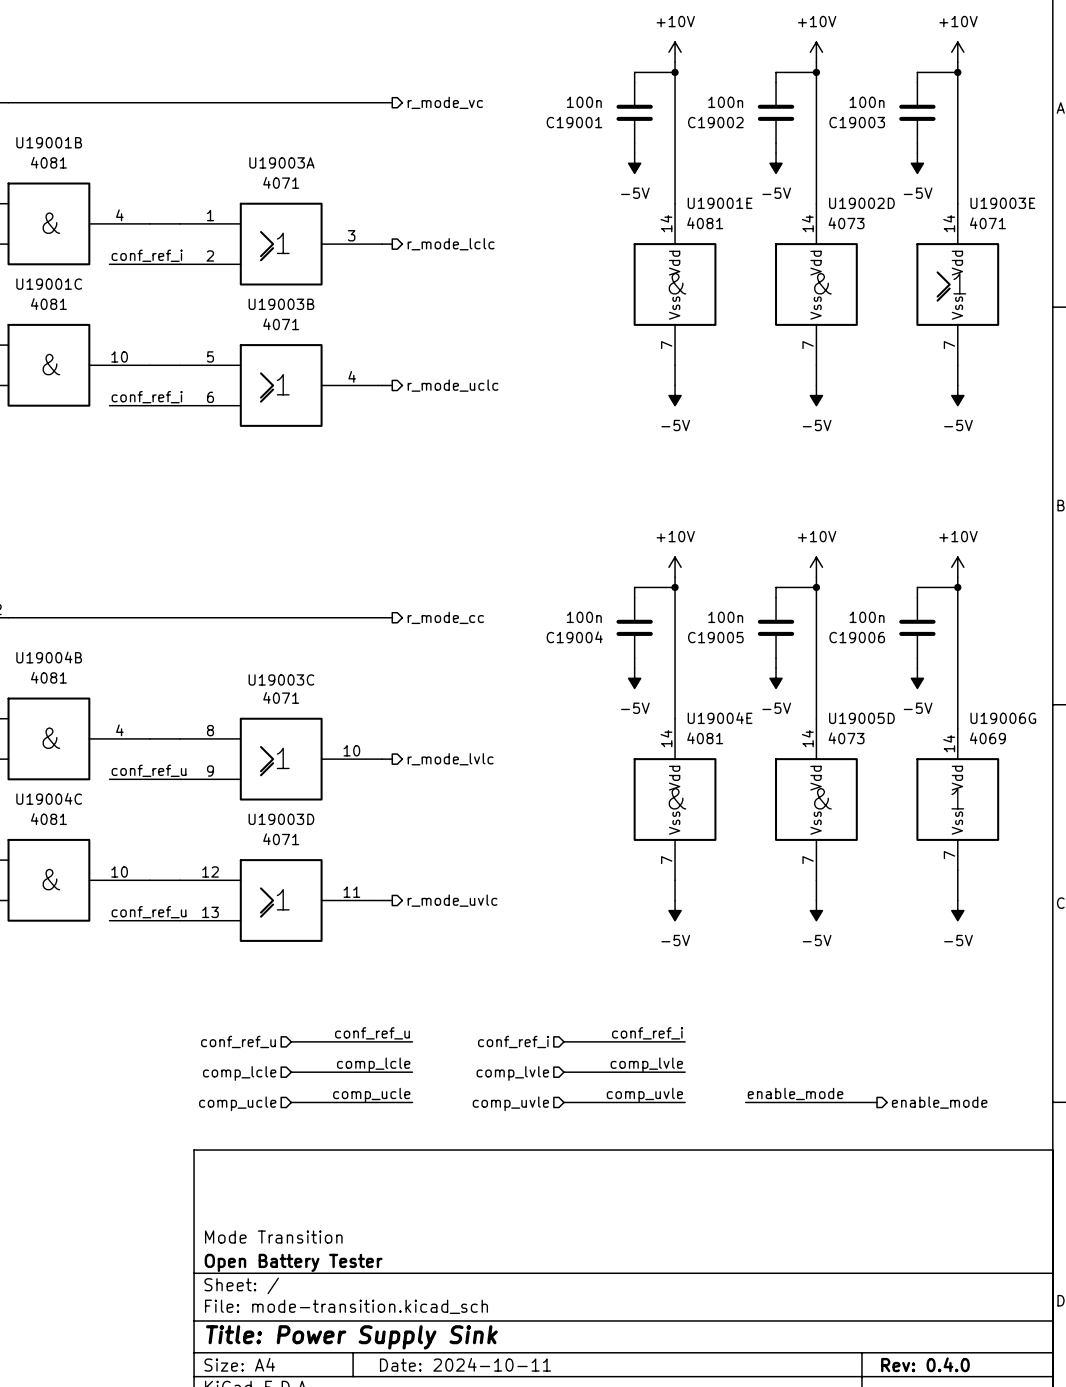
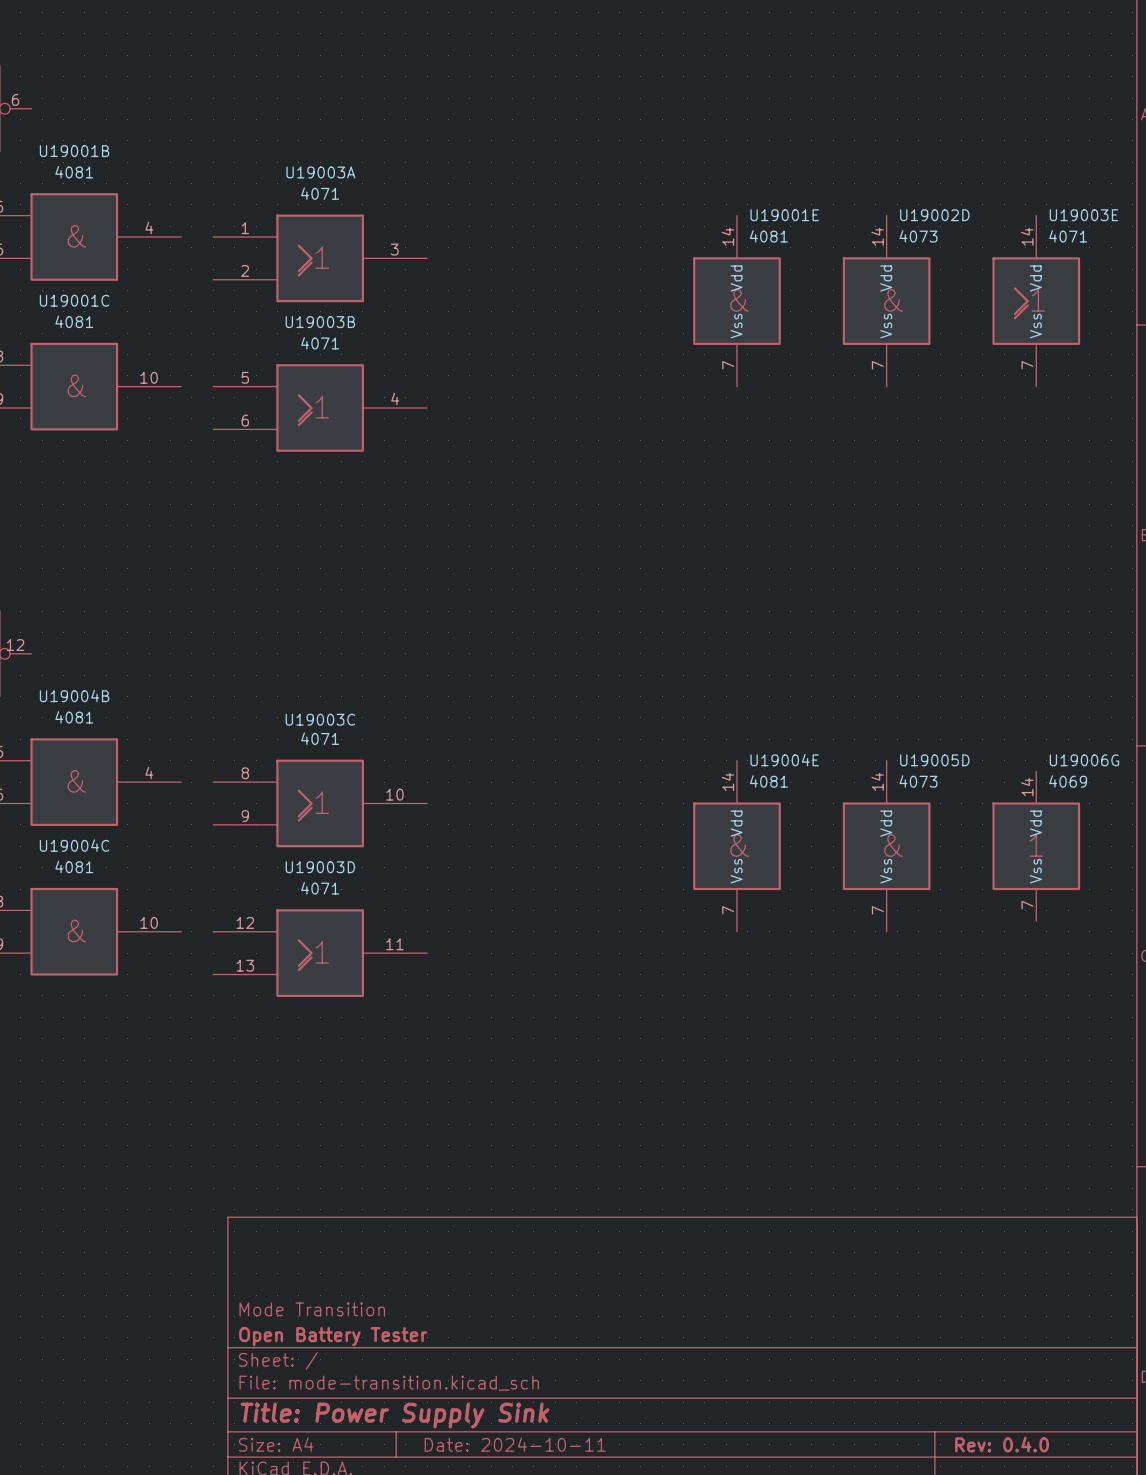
power symbol: +10V (675, 52) -> none
power symbol: +10V (816, 52) -> none
power symbol: +10V (957, 52) -> none
wire: (675, 62) (675, 203) -> none
wire: (816, 62) (816, 203) -> none
wire: (957, 62) (957, 203) -> none
wire: (675, 72) (634, 72) (634, 82) -> none
junction: (675, 72) -> none
wire: (816, 72) (776, 72) (776, 82) -> none
junction: (816, 72) -> none
wire: (957, 72) (917, 72) (917, 82) -> none
junction: (957, 72) -> none
wire: (8, 102) (392, 102) -> none
hierarchical label: r_mode_vc (445, 102) -> none
C19001: 100n (634, 112) -> none
C19002: 100n (776, 112) -> none
C19003: 100n (917, 112) -> none
wire: (634, 143) (634, 153) -> none
wire: (776, 143) (776, 153) -> none
wire: (917, 143) (917, 153) -> none
power symbol: -5V (634, 163) -> none
power symbol: -5V (776, 163) -> none
power symbol: -5V (917, 163) -> none
wire: (149, 223) (180, 223) -> none
wire: (382, 244) (392, 244) -> none
hierarchical label: r_mode_lclc (451, 244) -> none
label: conf_ref_i (147, 255) -> none
wire: (109, 264) (180, 264) -> none
wire: (149, 365) (180, 365) -> none
wire: (675, 365) (675, 385) -> none
wire: (816, 365) (816, 385) -> none
wire: (957, 365) (957, 385) -> none
wire: (382, 385) (392, 385) -> none
hierarchical label: r_mode_uclc (453, 385) -> none
power symbol: -5V (675, 395) -> none
power symbol: -5V (816, 395) -> none
power symbol: -5V (957, 395) -> none
label: conf_ref_i (147, 397) -> none
wire: (109, 405) (180, 405) -> none
power symbol: +10V (675, 567) -> none
power symbol: +10V (816, 567) -> none
power symbol: +10V (957, 567) -> none
wire: (675, 577) (675, 718) -> none
wire: (816, 577) (816, 718) -> none
wire: (957, 577) (957, 728) -> none
wire: (675, 587) (634, 587) (634, 597) -> none
junction: (675, 587) -> none
wire: (816, 587) (776, 587) (776, 597) -> none
junction: (816, 587) -> none
wire: (957, 587) (917, 587) (917, 597) -> none
junction: (957, 587) -> none
wire: (8, 617) (392, 617) -> none
hierarchical label: r_mode_cc (445, 617) -> none
C19004: 100n (634, 627) -> none
C19005: 100n (776, 627) -> none
C19006: 100n (917, 627) -> none
wire: (634, 658) (634, 668) -> none
wire: (776, 658) (776, 668) -> none
wire: (917, 658) (917, 668) -> none
power symbol: -5V (634, 678) -> none
power symbol: -5V (776, 678) -> none
power symbol: -5V (917, 678) -> none
wire: (149, 738) (180, 738) -> none
wire: (382, 759) (392, 759) -> none
hierarchical label: r_mode_lvlc (450, 759) -> none
label: conf_ref_u (149, 770) -> none
wire: (109, 779) (180, 779) -> none
wire: (957, 870) (957, 900) -> none
wire: (149, 880) (180, 880) -> none
wire: (675, 880) (675, 900) -> none
wire: (816, 880) (816, 900) -> none
wire: (382, 900) (392, 900) -> none
hierarchical label: r_mode_uvlc (452, 900) -> none
power symbol: -5V (675, 910) -> none
power symbol: -5V (816, 910) -> none
power symbol: -5V (957, 910) -> none
label: conf_ref_u (149, 912) -> none
wire: (109, 920) (180, 920) -> none
label: conf_ref_u (372, 1033) -> none
label: conf_ref_i (647, 1033) -> none
hierarchical label: conf_ref_u (238, 1041) -> none
wire: (291, 1041) (412, 1041) -> none
hierarchical label: conf_ref_i (513, 1041) -> none
wire: (563, 1041) (685, 1041) -> none
label: comp_lcle (373, 1064) -> none
label: comp_lvle (646, 1064) -> none
wire: (291, 1072) (412, 1072) -> none
wire: (563, 1072) (685, 1072) -> none
hierarchical label: comp_lcle (239, 1073) -> none
hierarchical label: comp_lvle (512, 1073) -> none
label: enable_mode (795, 1093) -> none
label: comp_ucle (371, 1095) -> none
label: comp_uvle (644, 1095) -> none
wire: (291, 1102) (412, 1102) -> none
wire: (563, 1102) (685, 1102) -> none
wire: (745, 1102) (877, 1102) -> none
hierarchical label: enable_mode (939, 1102) -> none
hierarchical label: comp_ucle (237, 1103) -> none
hierarchical label: comp_uvle (510, 1103) -> none

